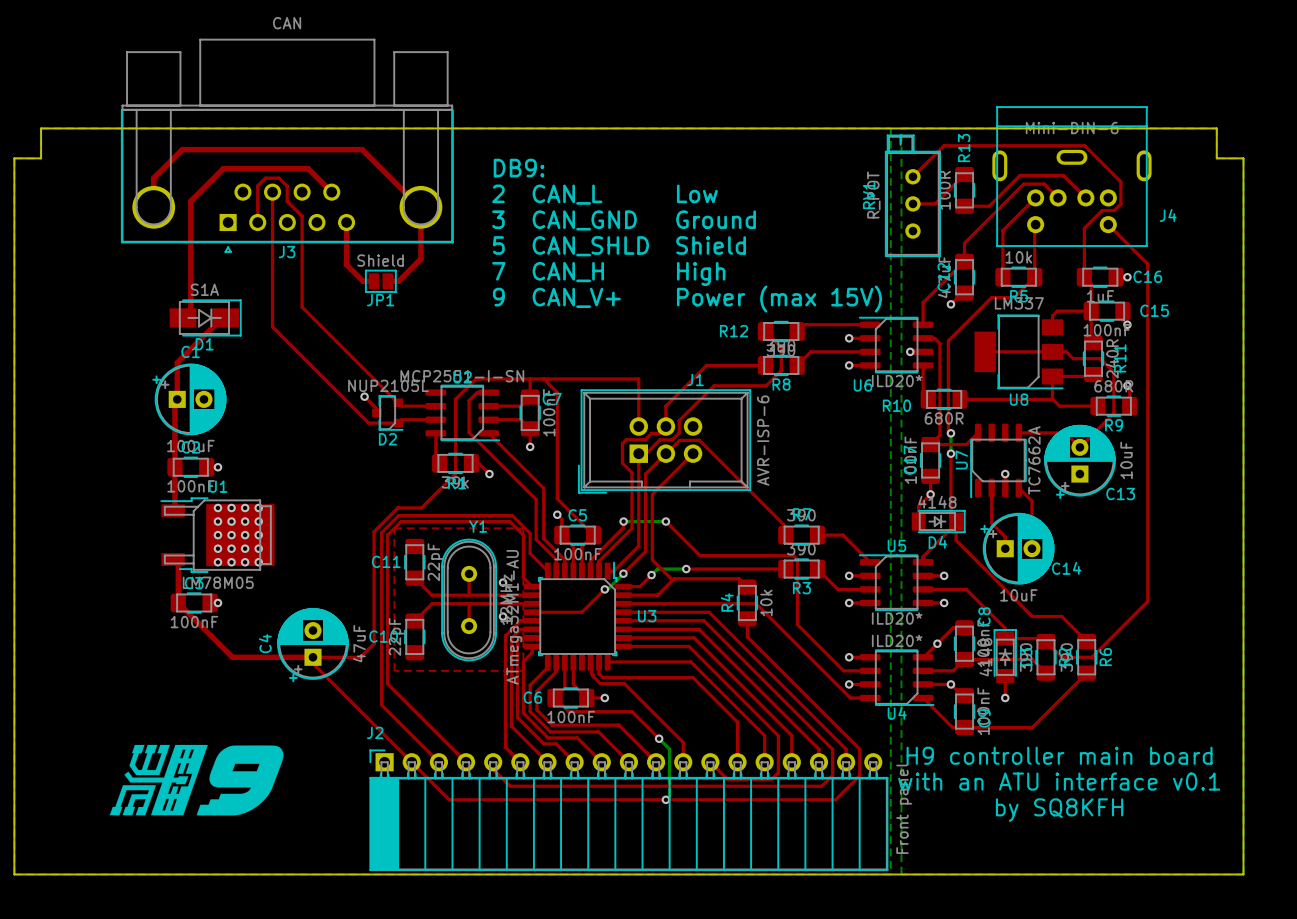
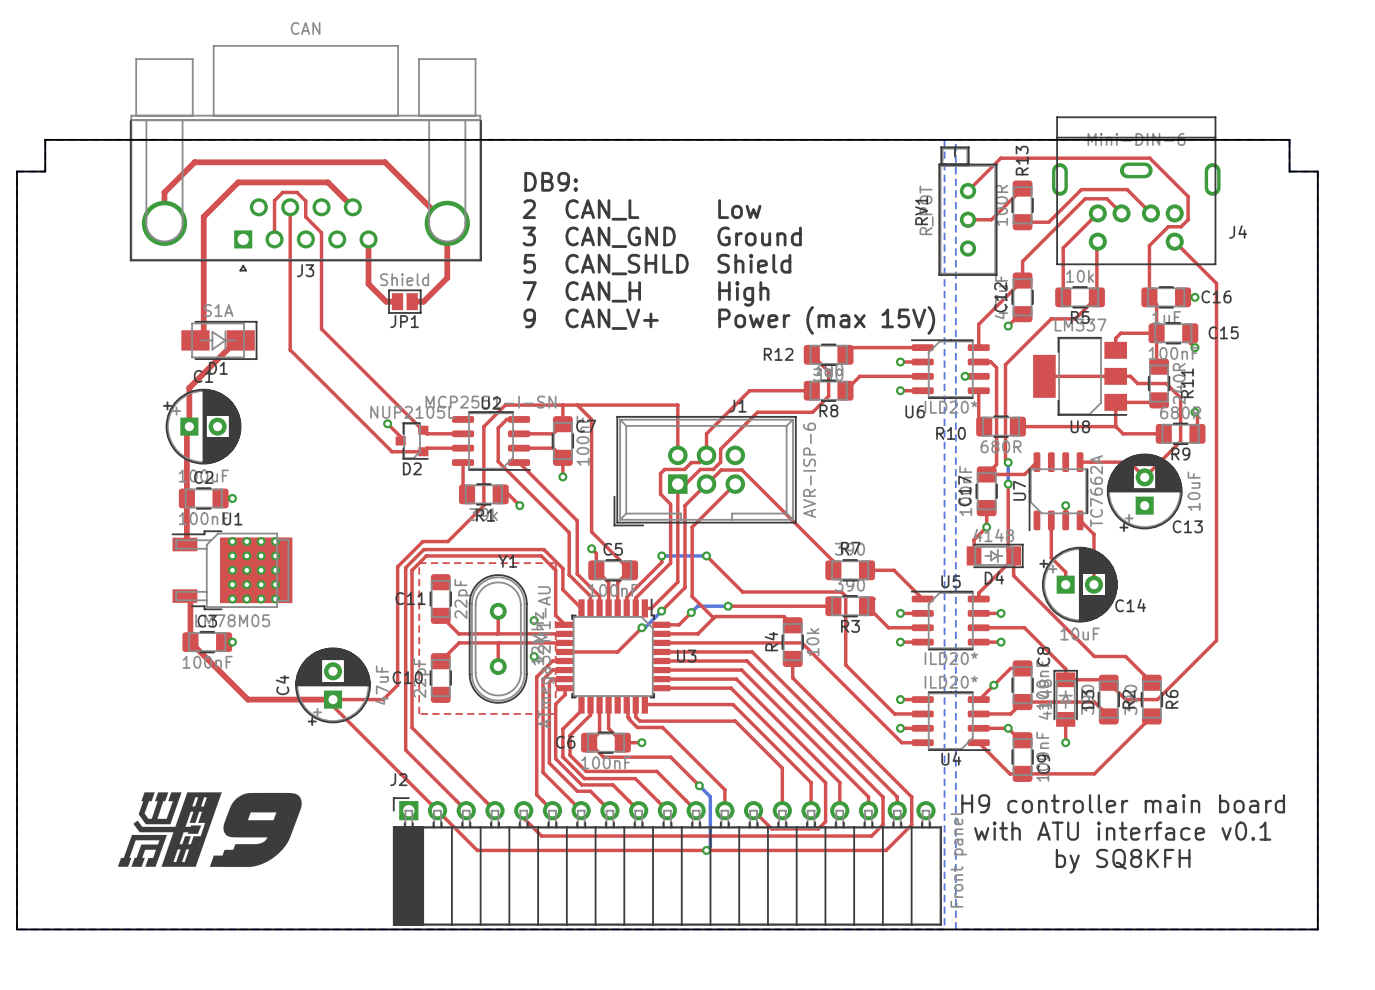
text: with an ATU interface v0.1 (1059, 781) -> with ATU interface v0.1 (1122, 831)

